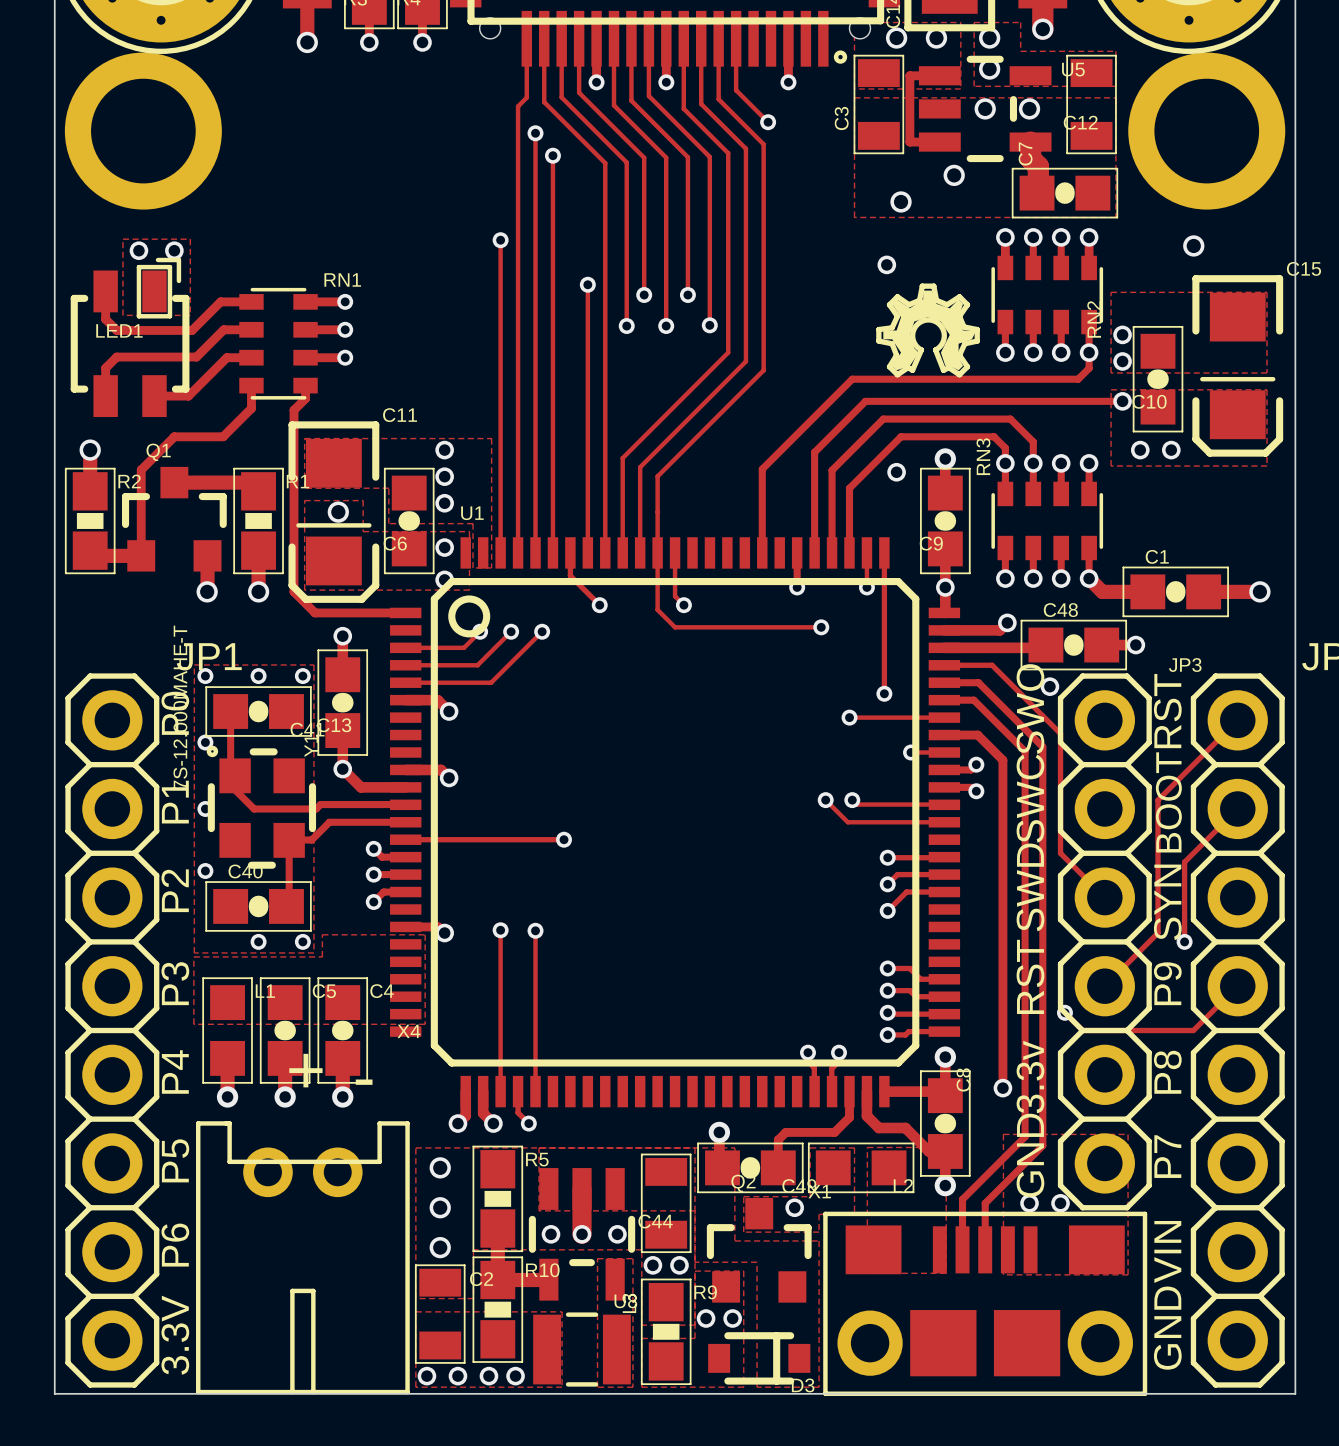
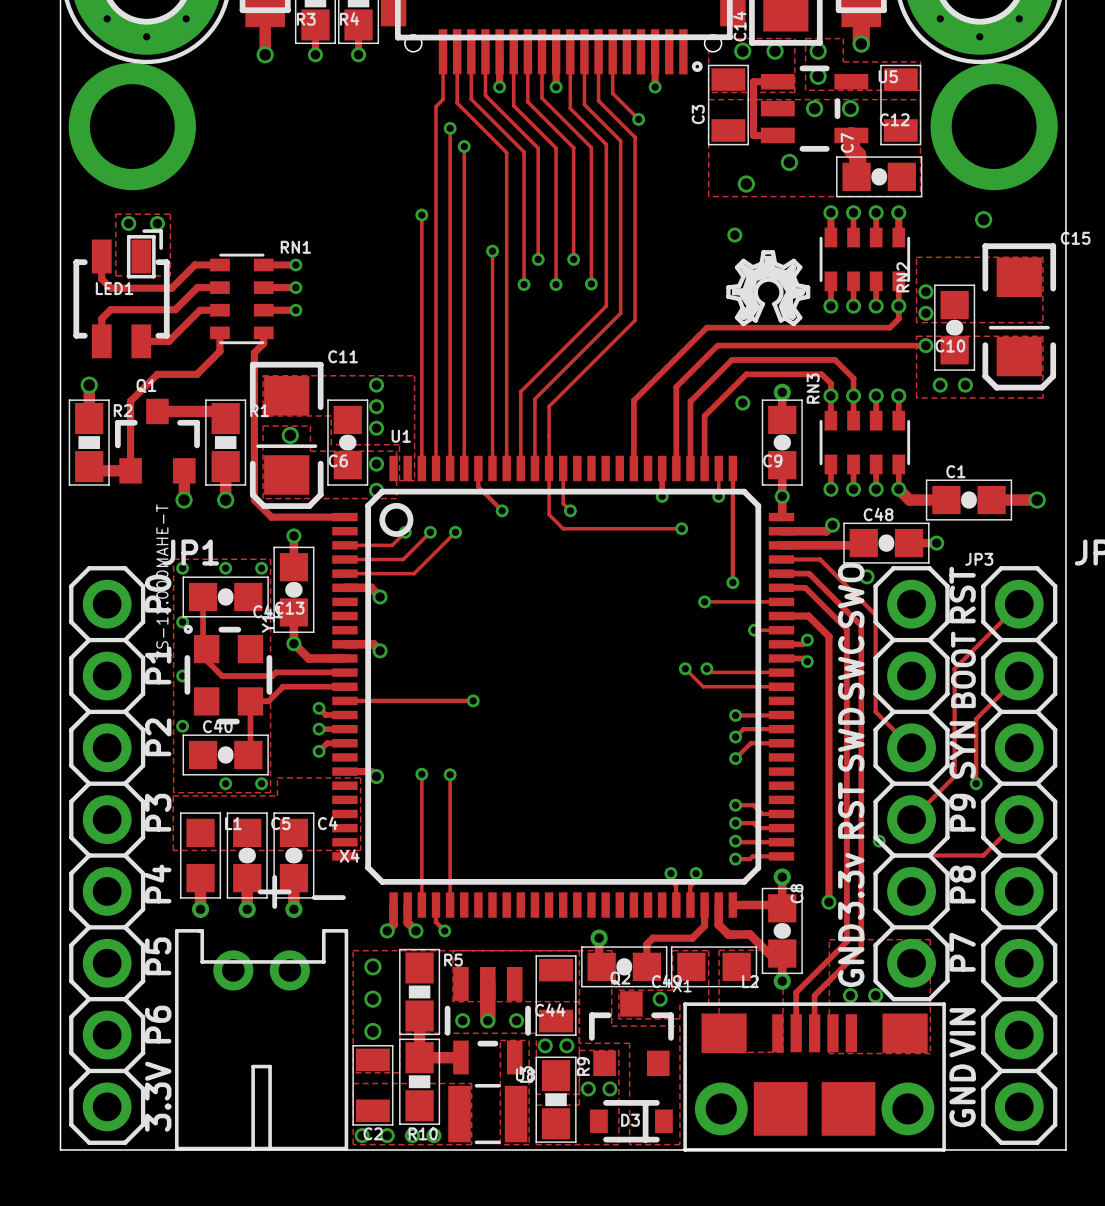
R10 name position: R10 (542, 1270) -> R10 (423, 1133)
C2 name position: C2 (481, 1279) -> C2 (373, 1133)
R9 name rotation: 0° (705, 1292) -> 90° counterclockwise (583, 1066)
D3 name position: D3 (803, 1385) -> D3 (630, 1120)

